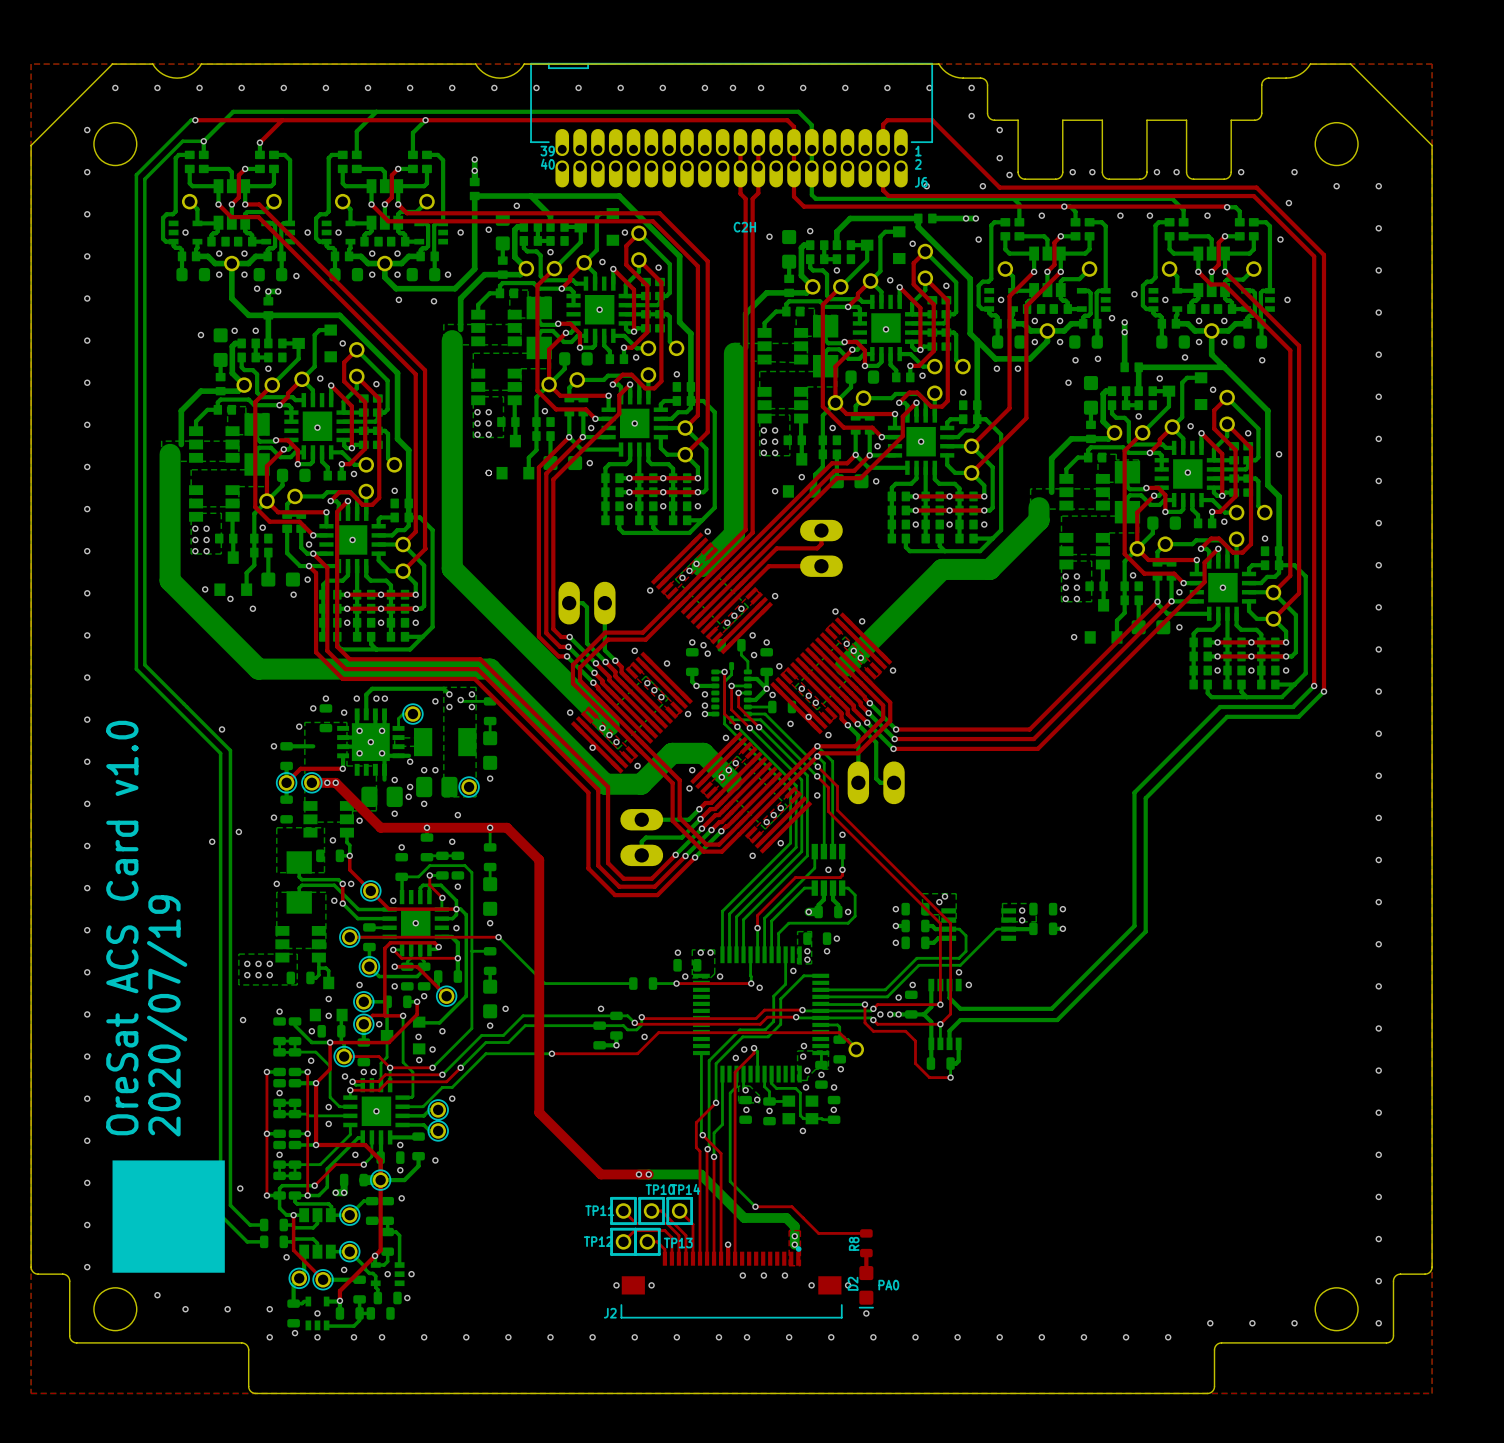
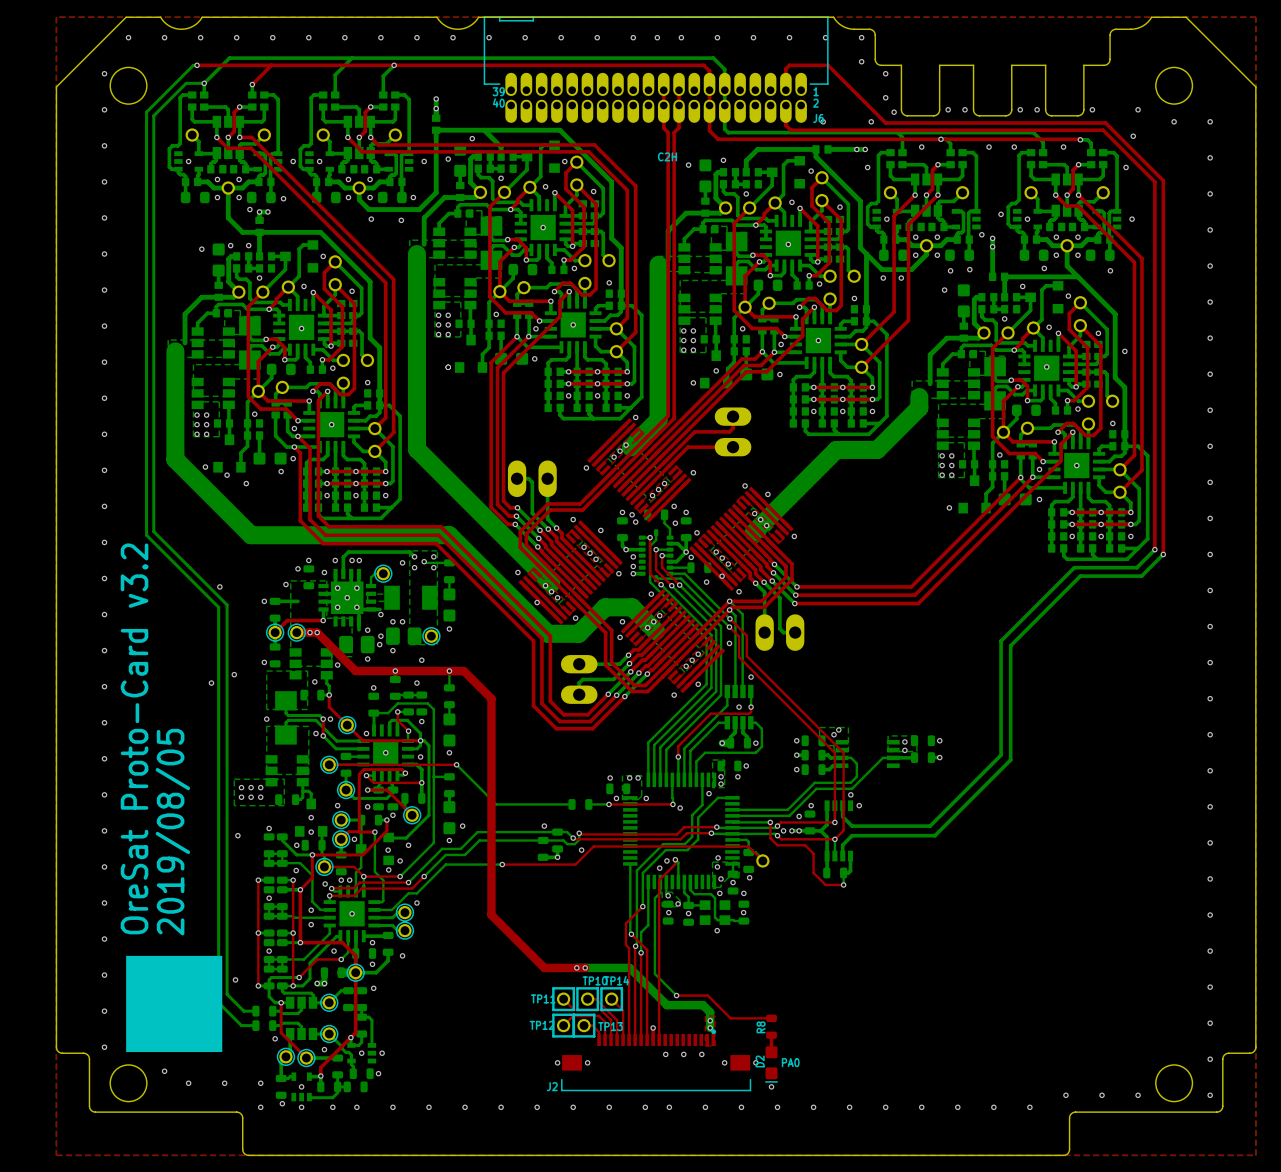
text: OreSat ACS Card v1.0 (122, 928) -> OreSat Proto-Card v3.2 (134, 738)
text: 2020/07/19 (167, 1015) -> 2019/08/05 (172, 832)

